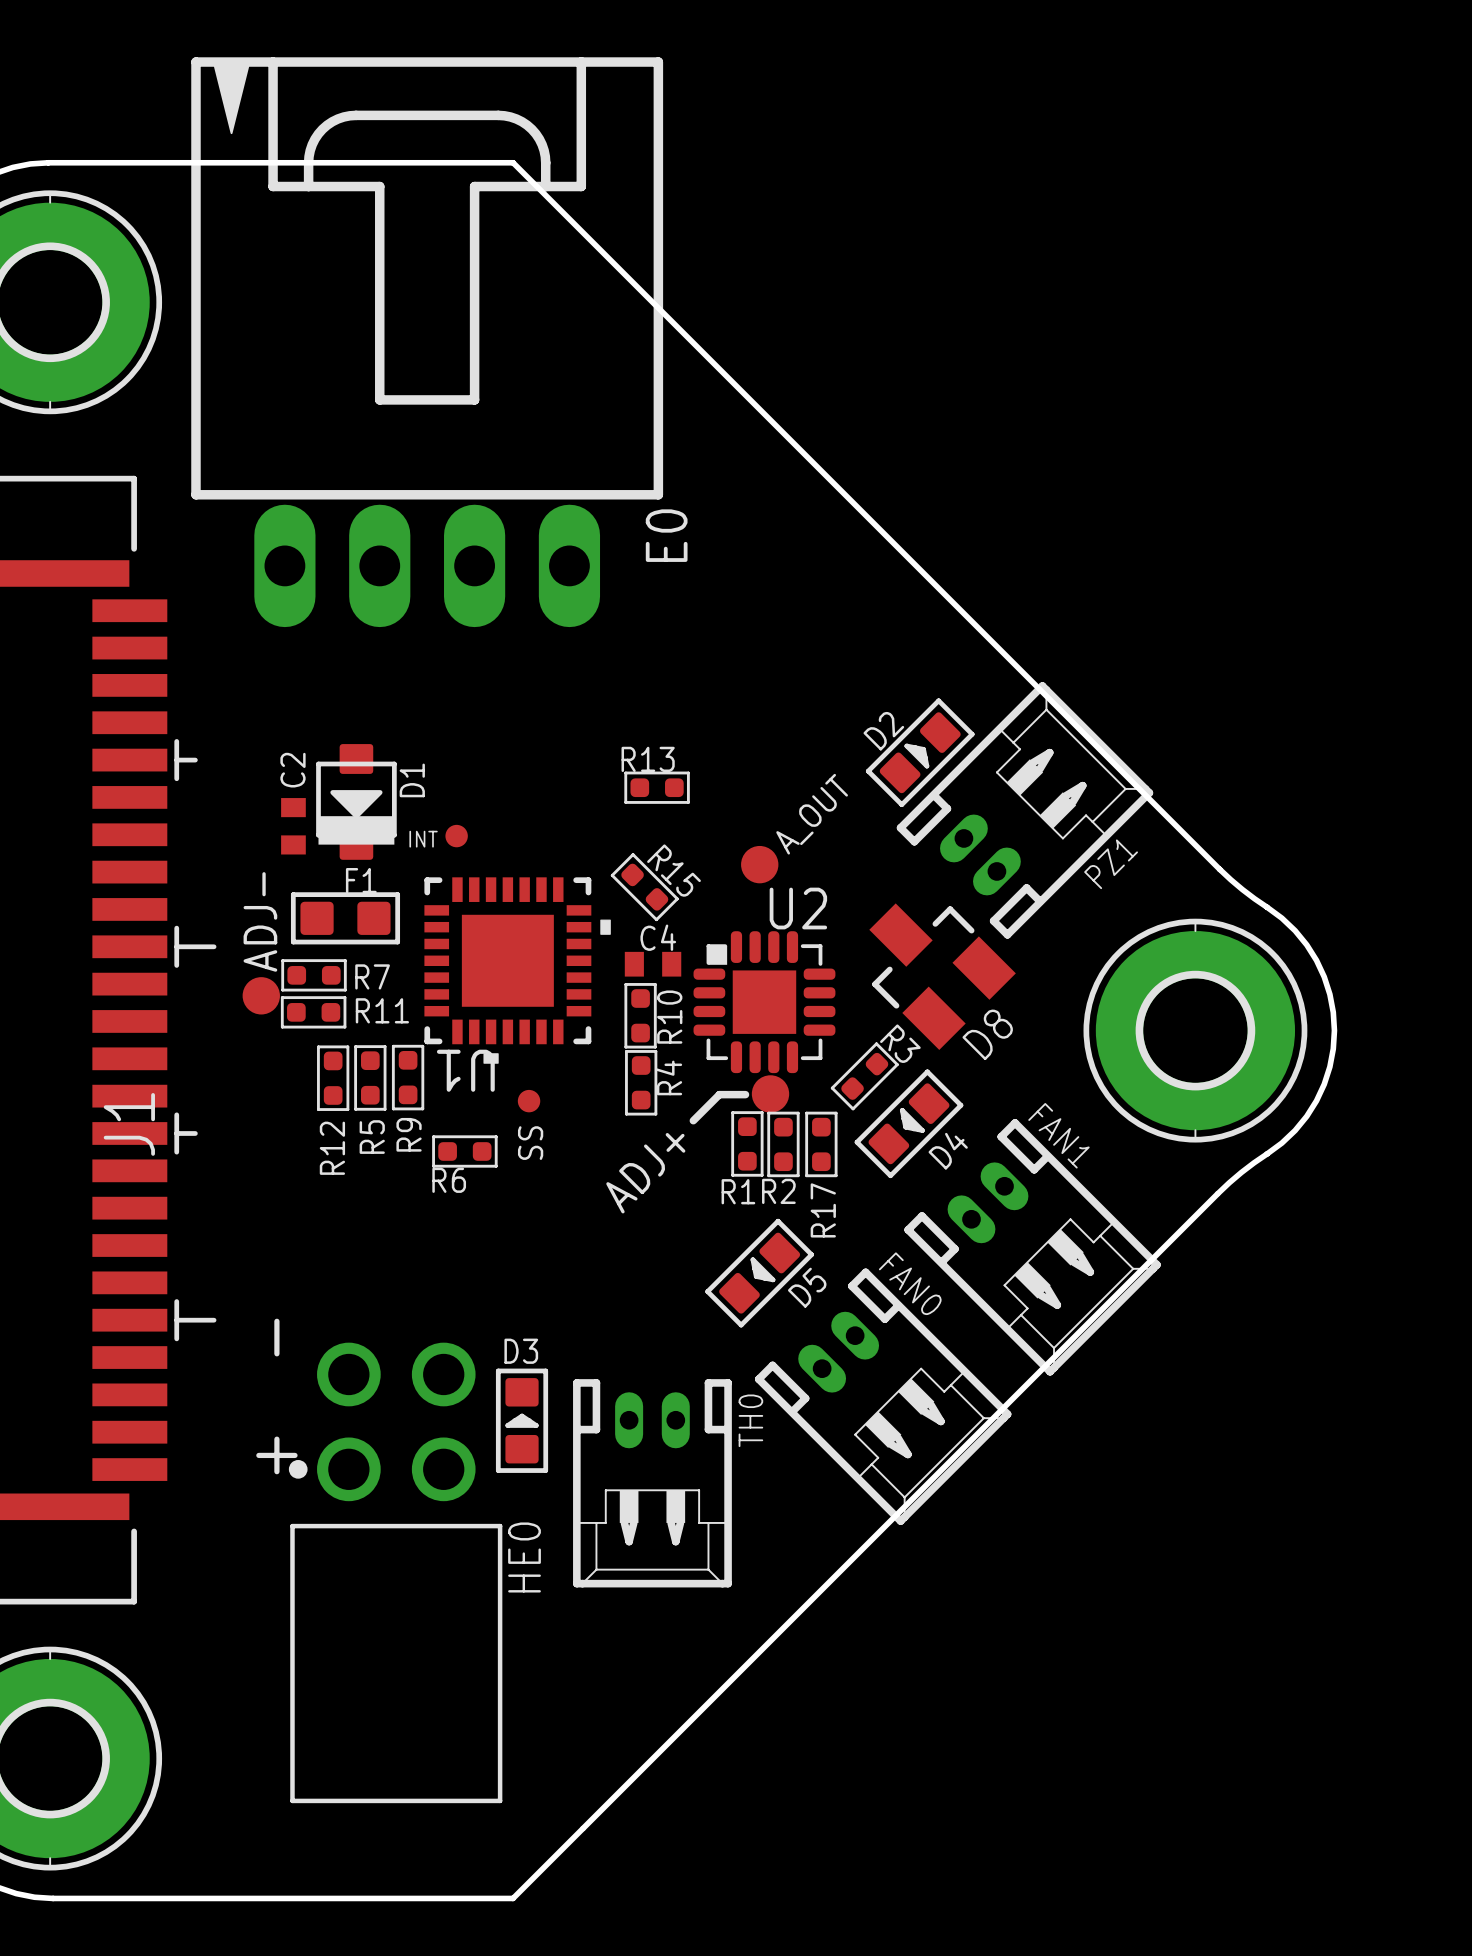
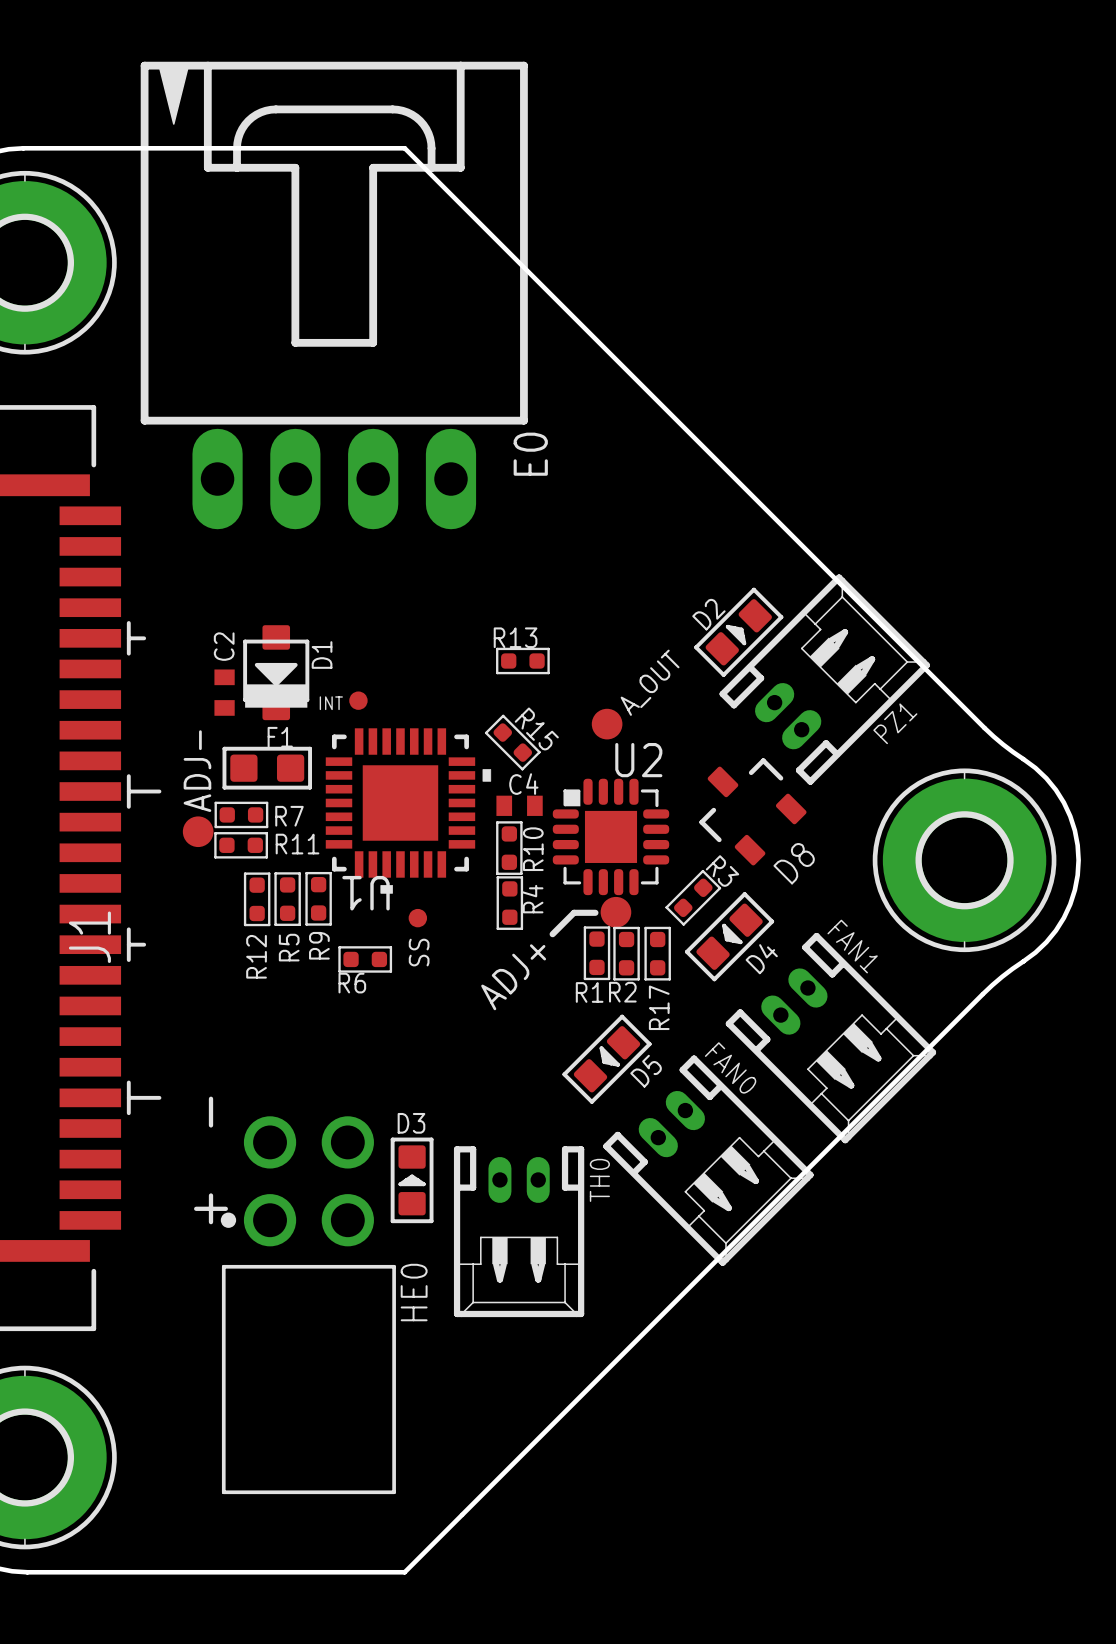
U1 footprint: [424, 877, 611, 1064] -> [325, 728, 492, 894]
D8 footprint: [869, 903, 1016, 1050] -> [699, 758, 807, 866]

